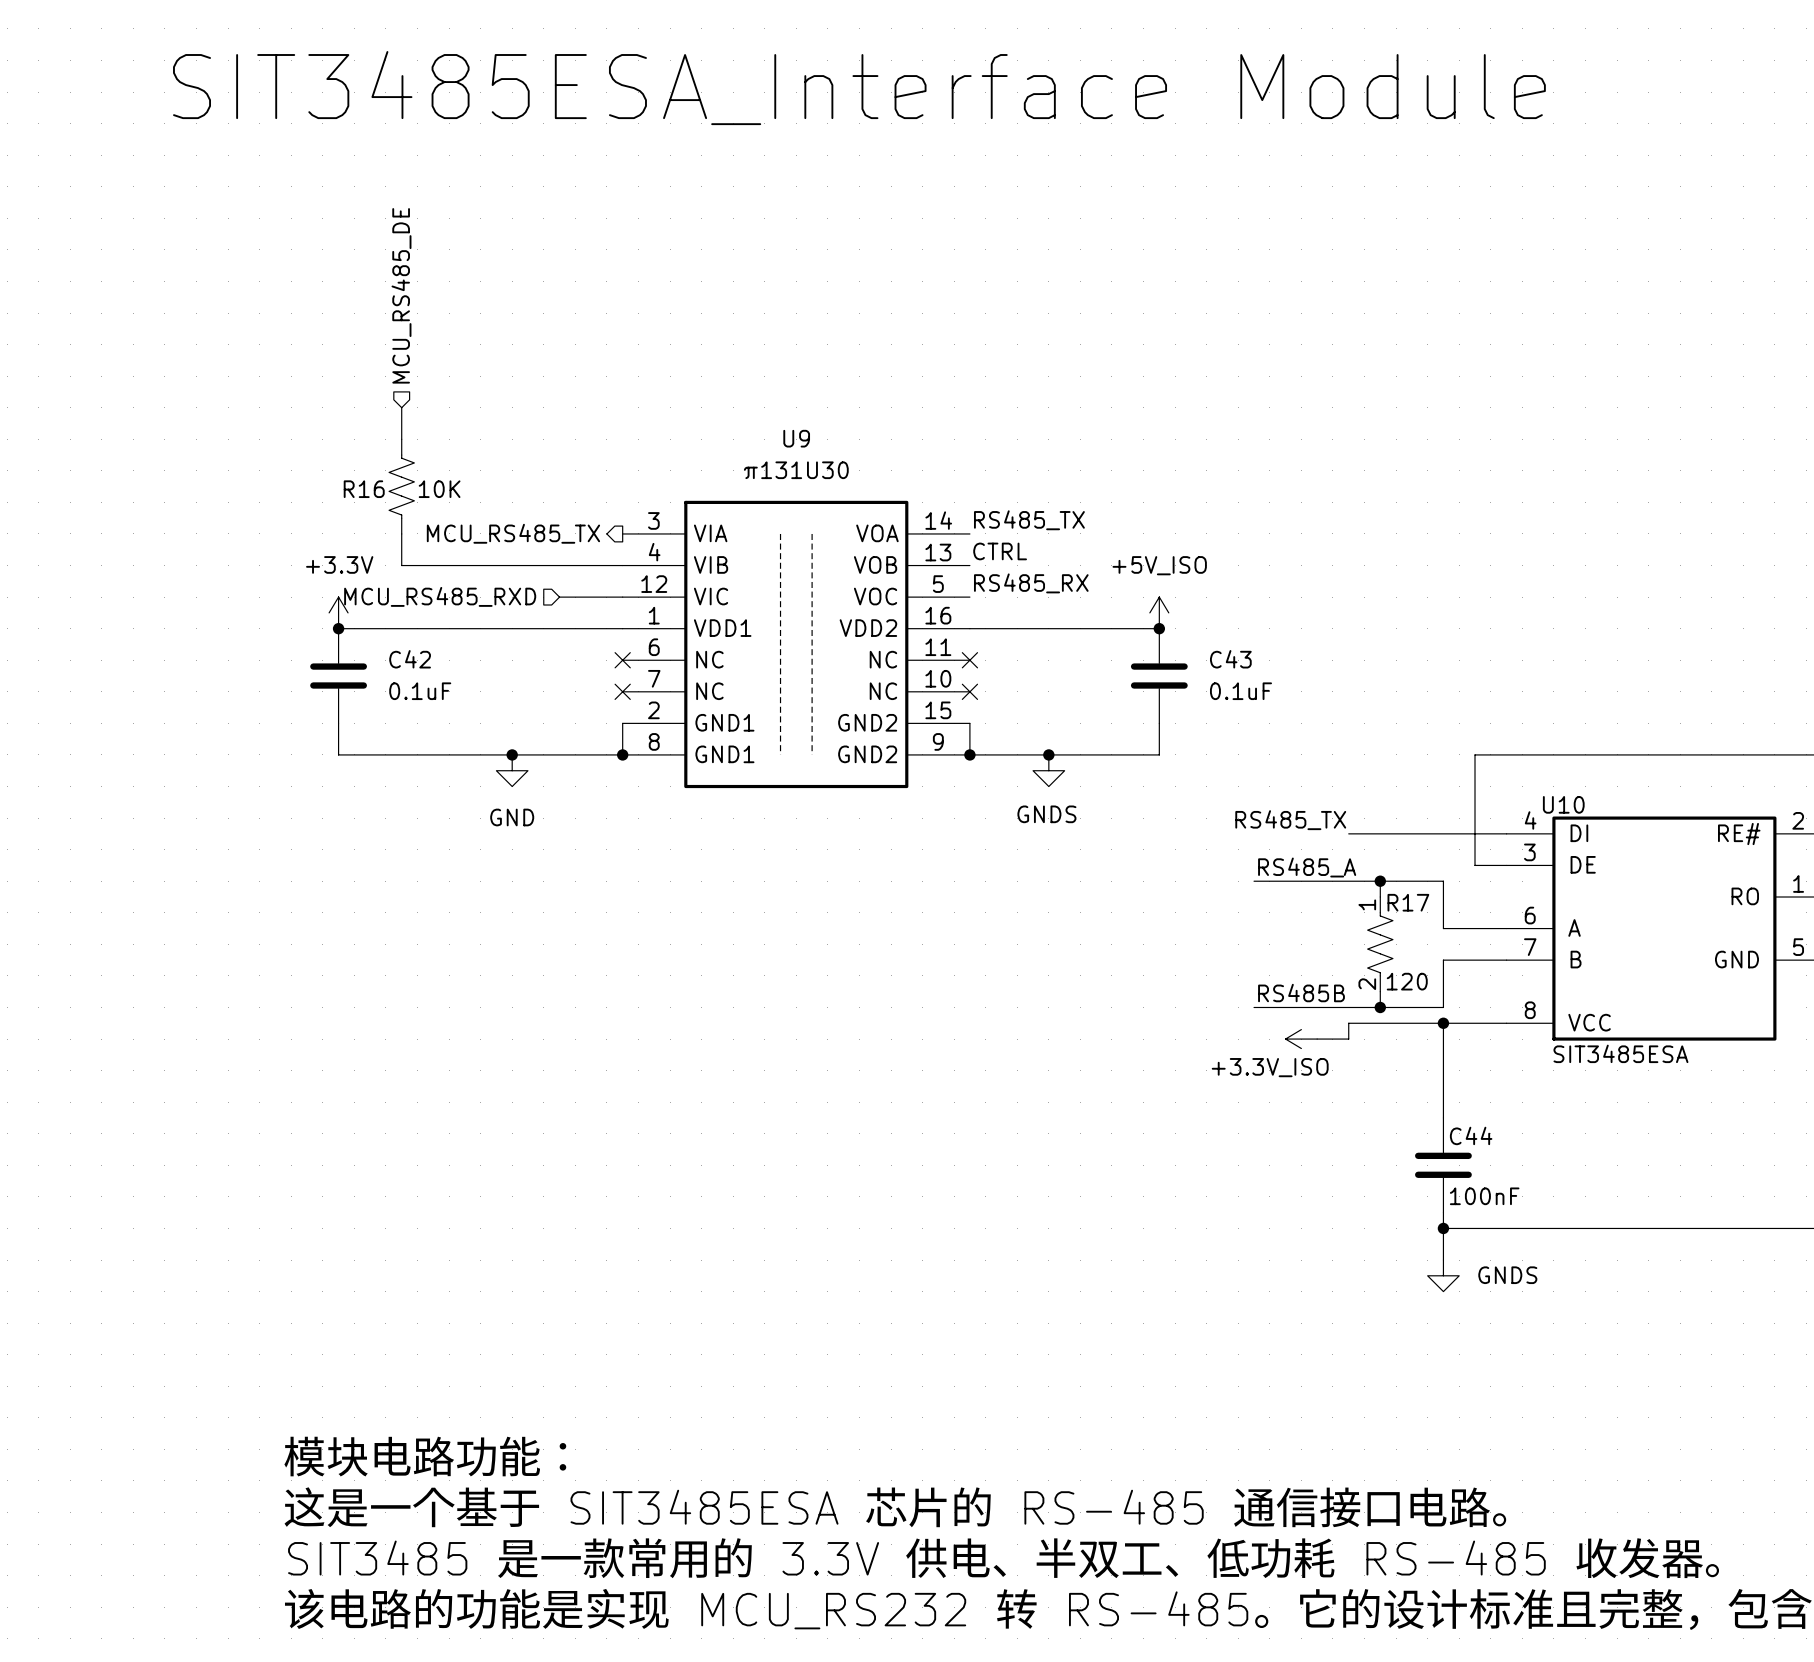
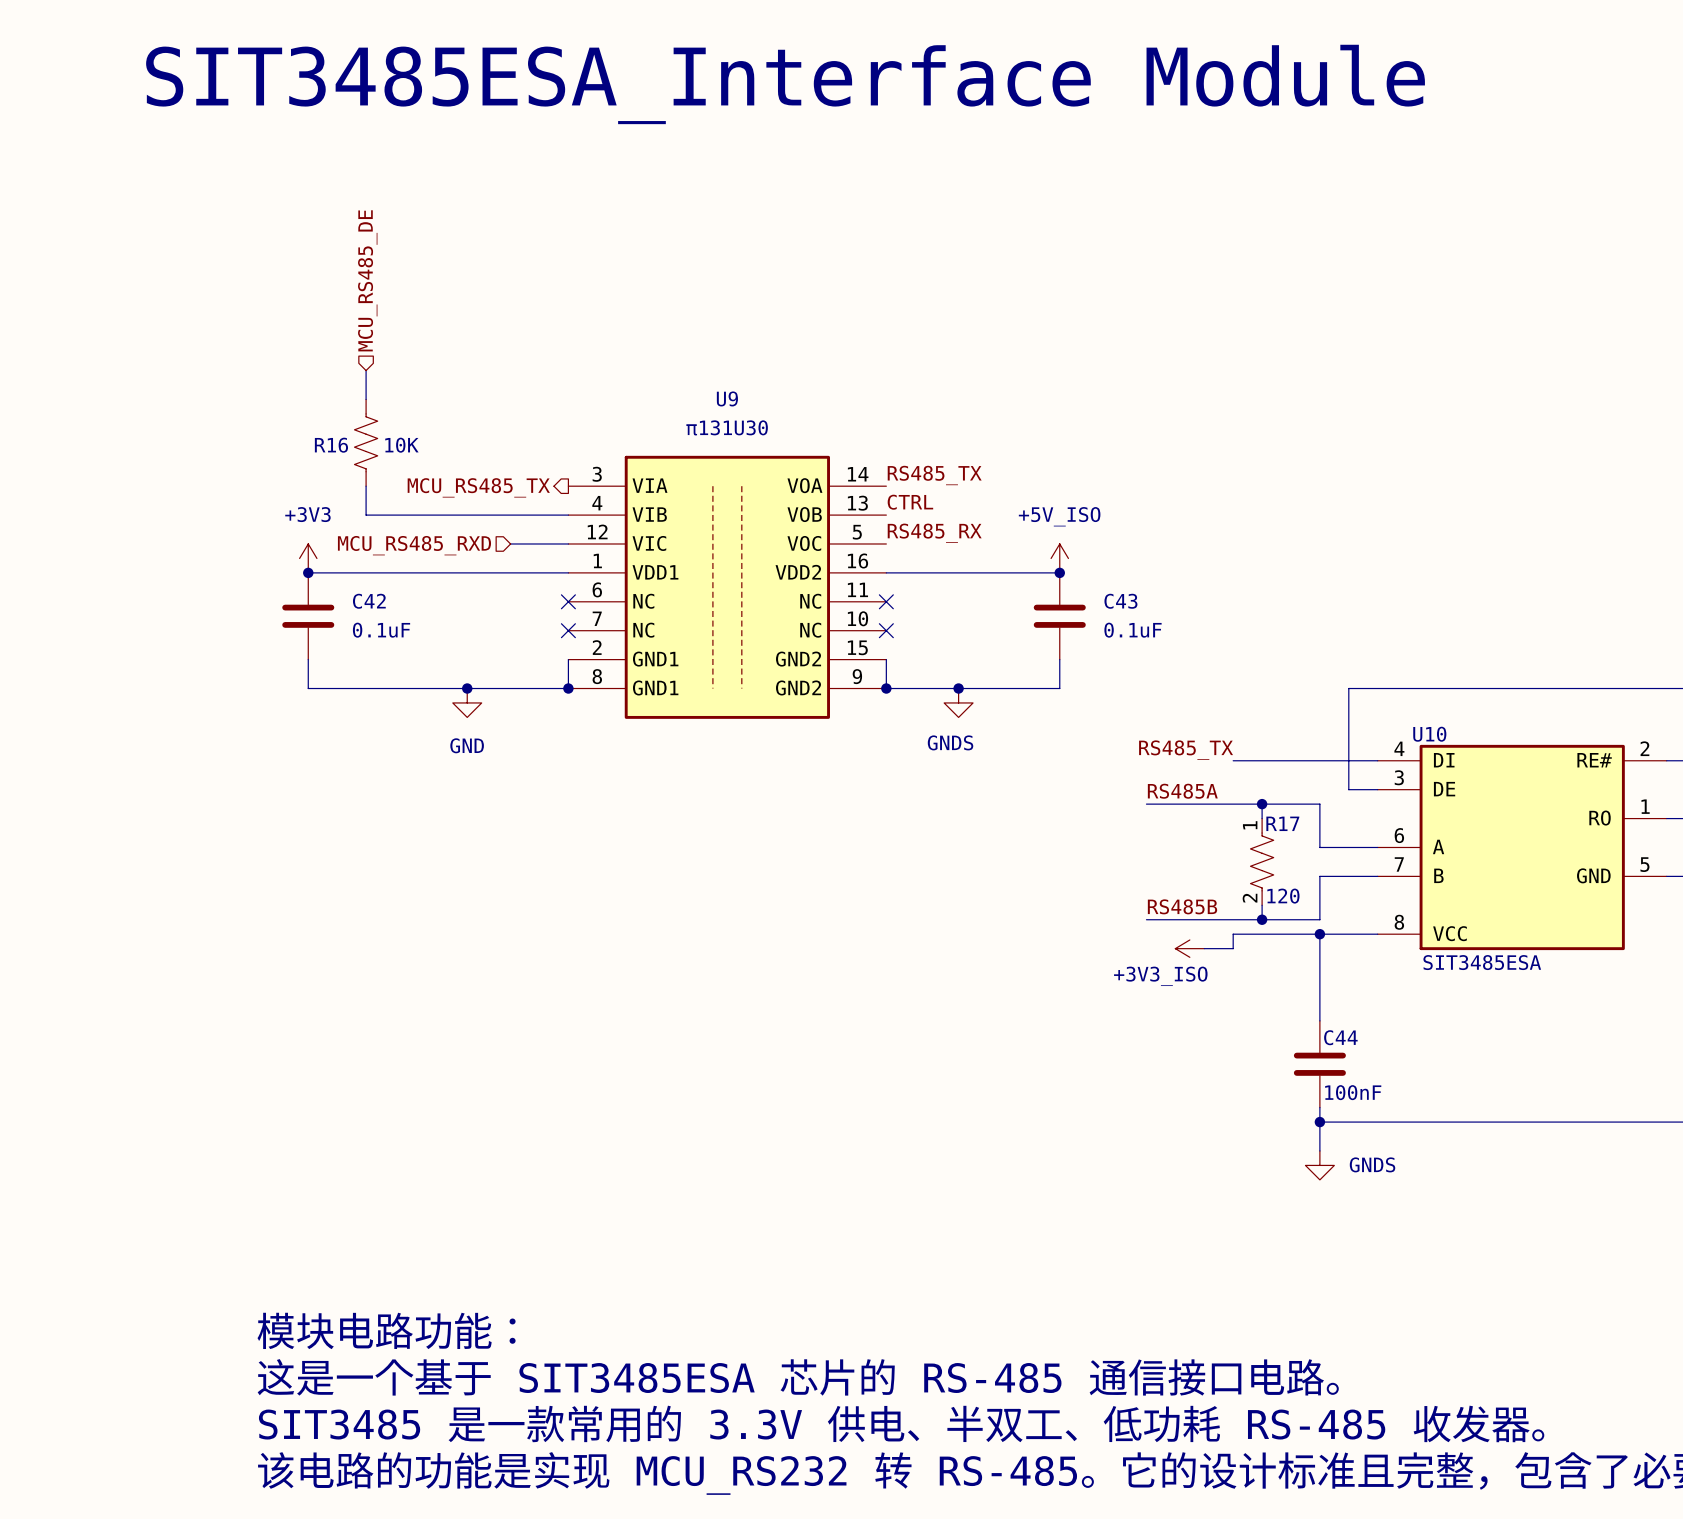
power symbol: +3.3V (338, 612) -> +3V3 (308, 558)
label: RS485_A (1307, 867) -> RS485A (1182, 791)
power symbol: +3.3V_ISO (1301, 1039) -> +3V3_ISO (1189, 948)

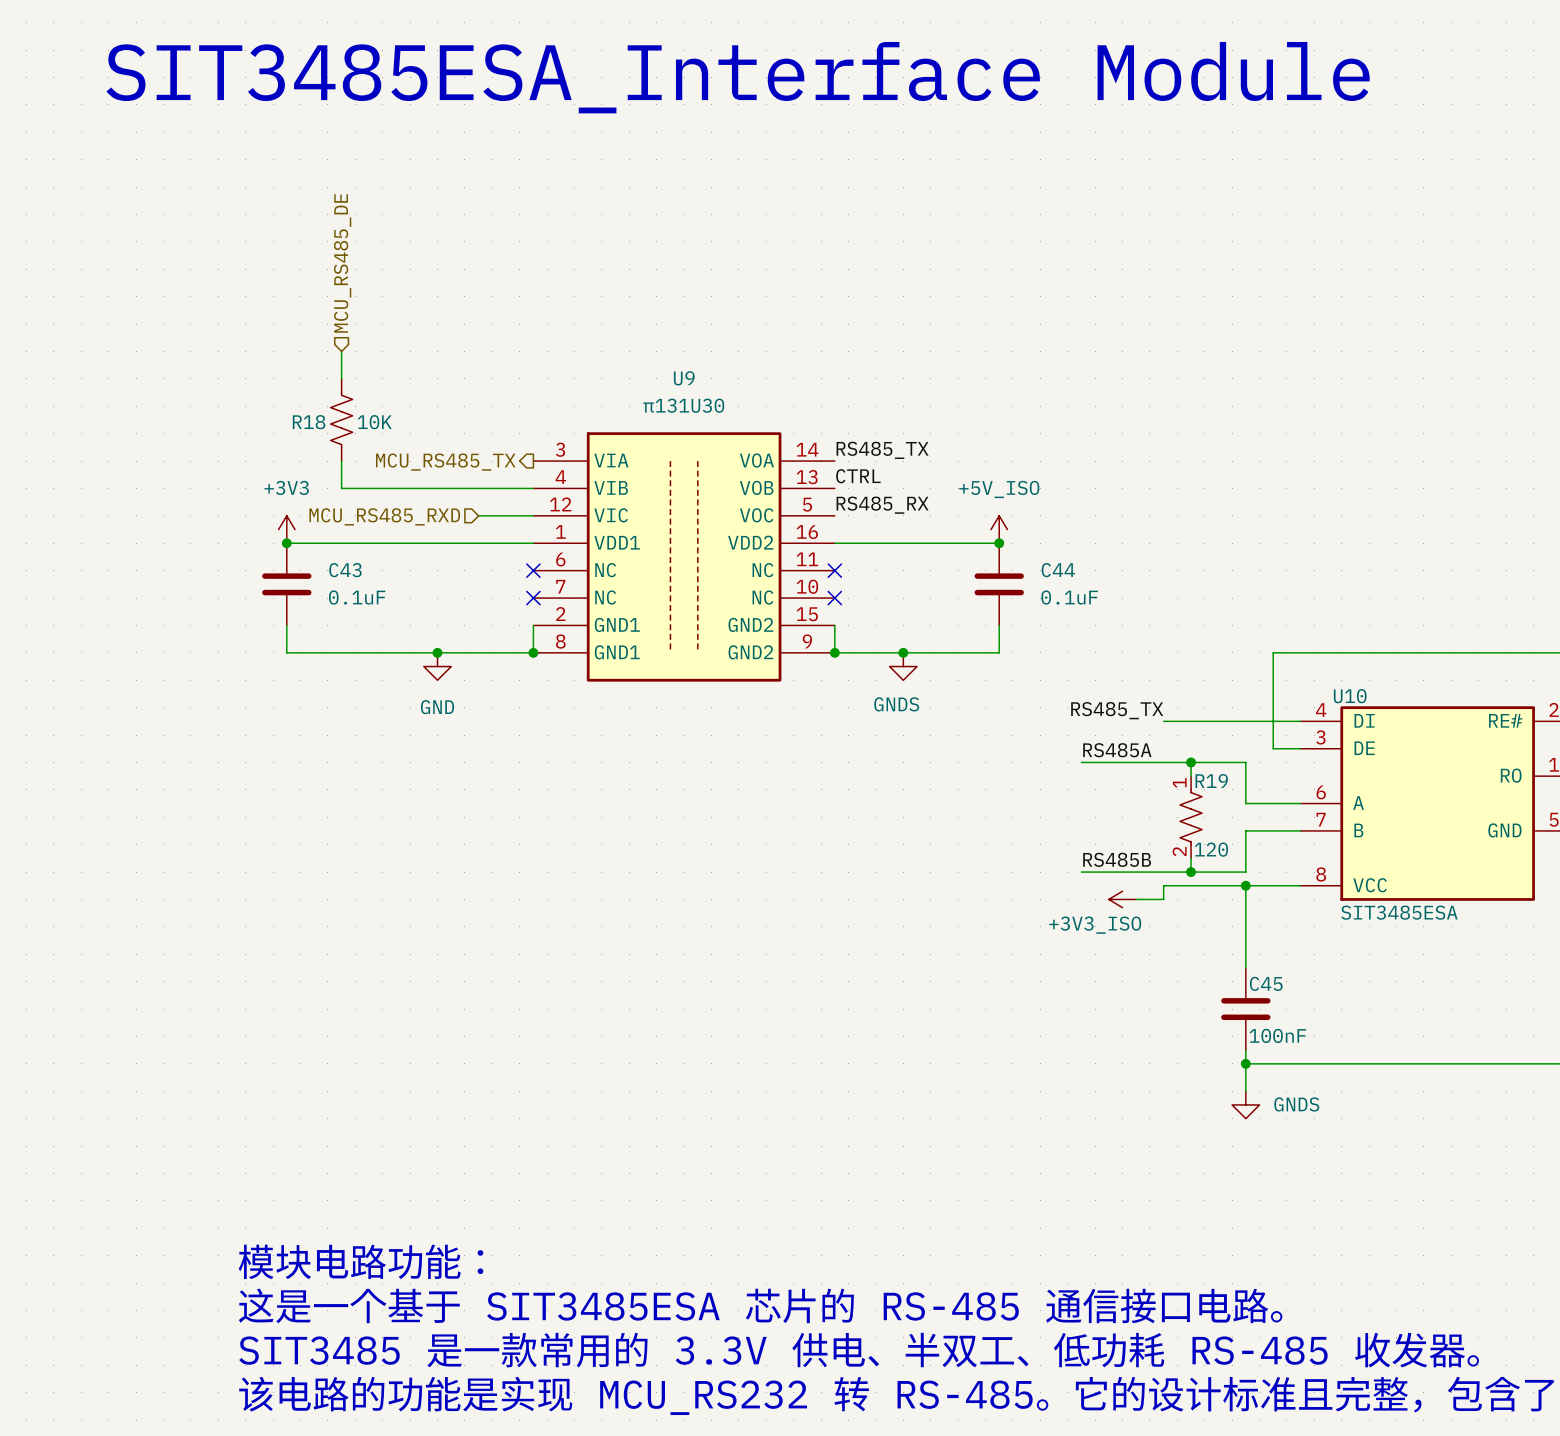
R16 name: R16 (331, 445) -> R18 (309, 422)
C42 name: C42 (369, 601) -> C43 (345, 570)
C43 name: C43 (1120, 601) -> C44 (1058, 570)
R17 name: R17 (1282, 823) -> R19 (1211, 781)
C44 name: C44 (1340, 1037) -> C45 (1266, 983)

